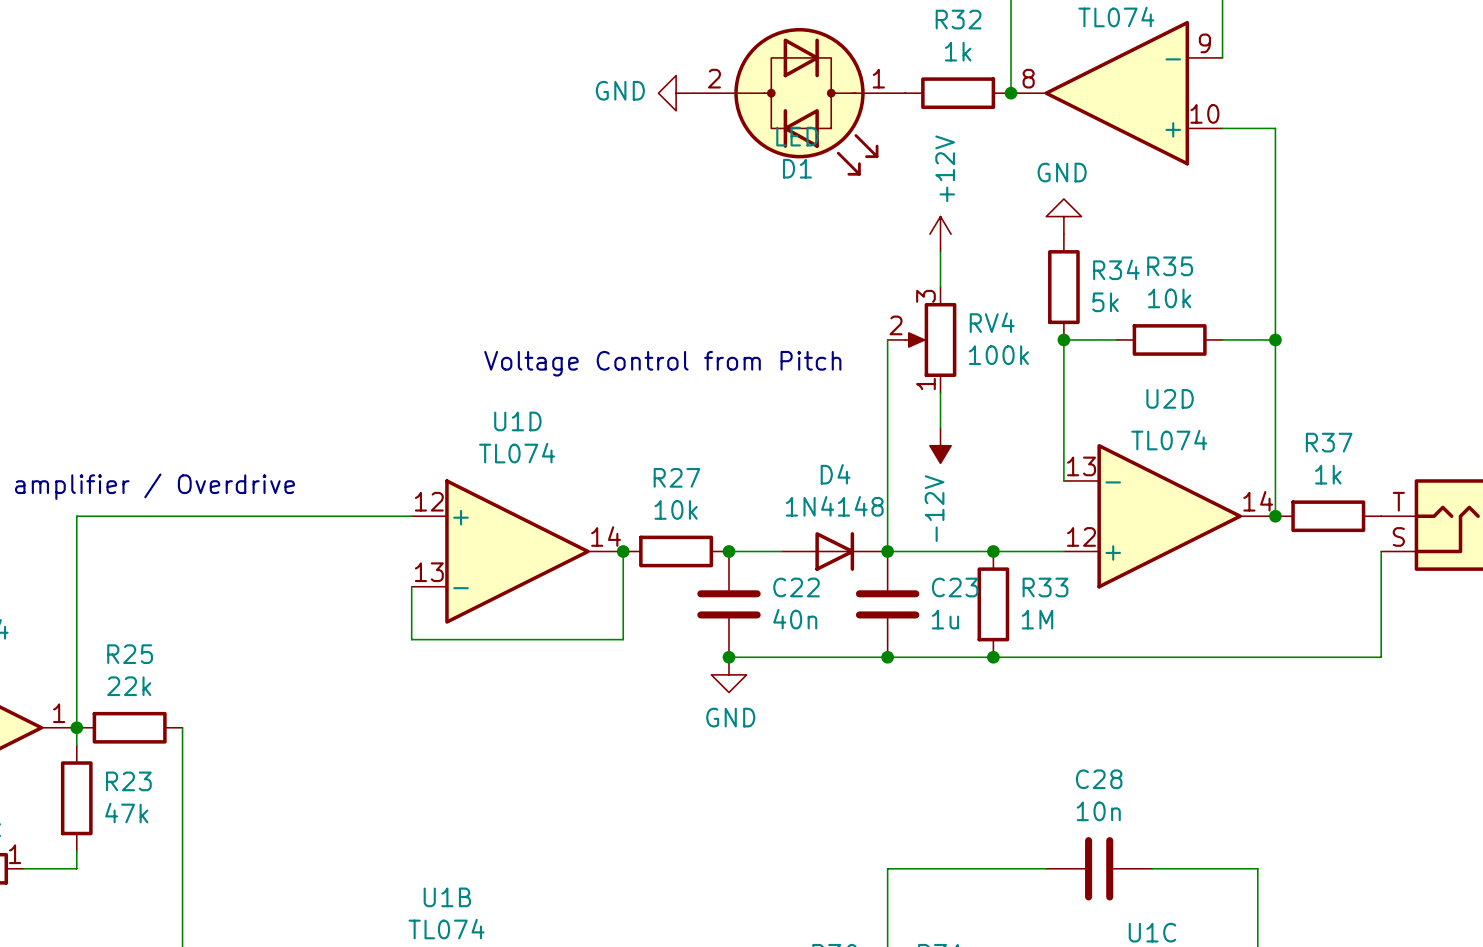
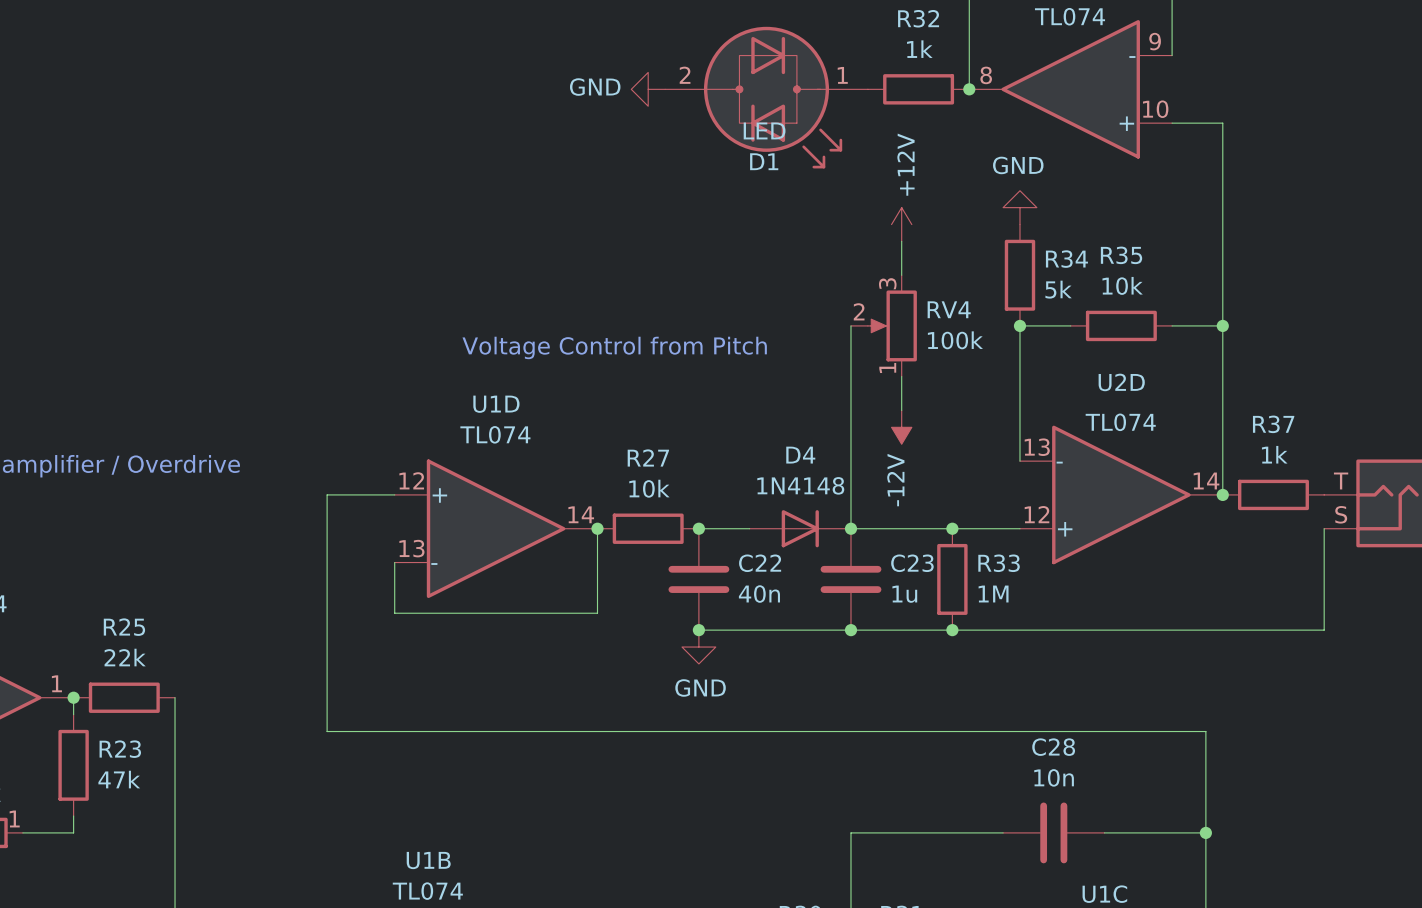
wire: (341, 516) (76, 516) (76, 727) -> (327, 494) (327, 731) (1205, 731) (1205, 832)
junction: none -> (1205, 832)

